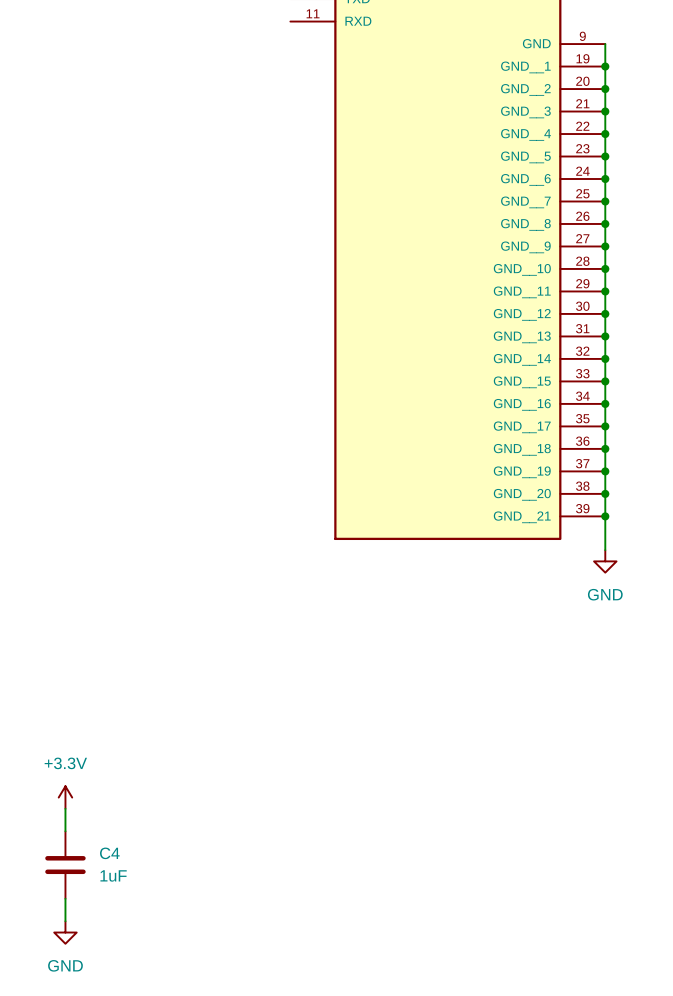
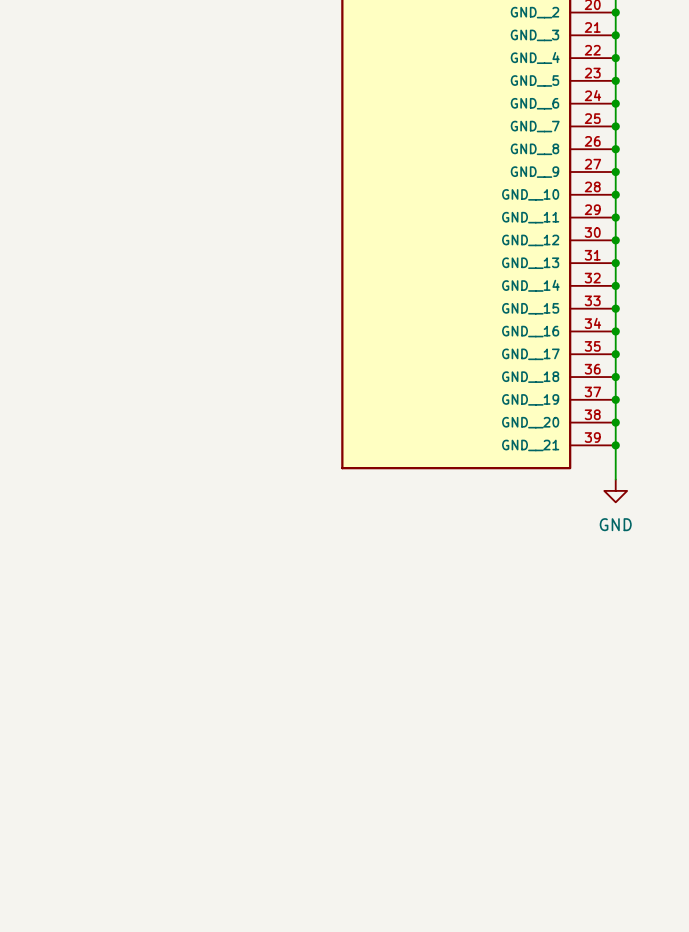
power symbol: +3.3V (65, 797) -> none
wire: (65, 808) (65, 831) -> none
C4: 1uF (65, 865) -> none
wire: (65, 898) (65, 921) -> none
power symbol: GND (65, 932) -> none

